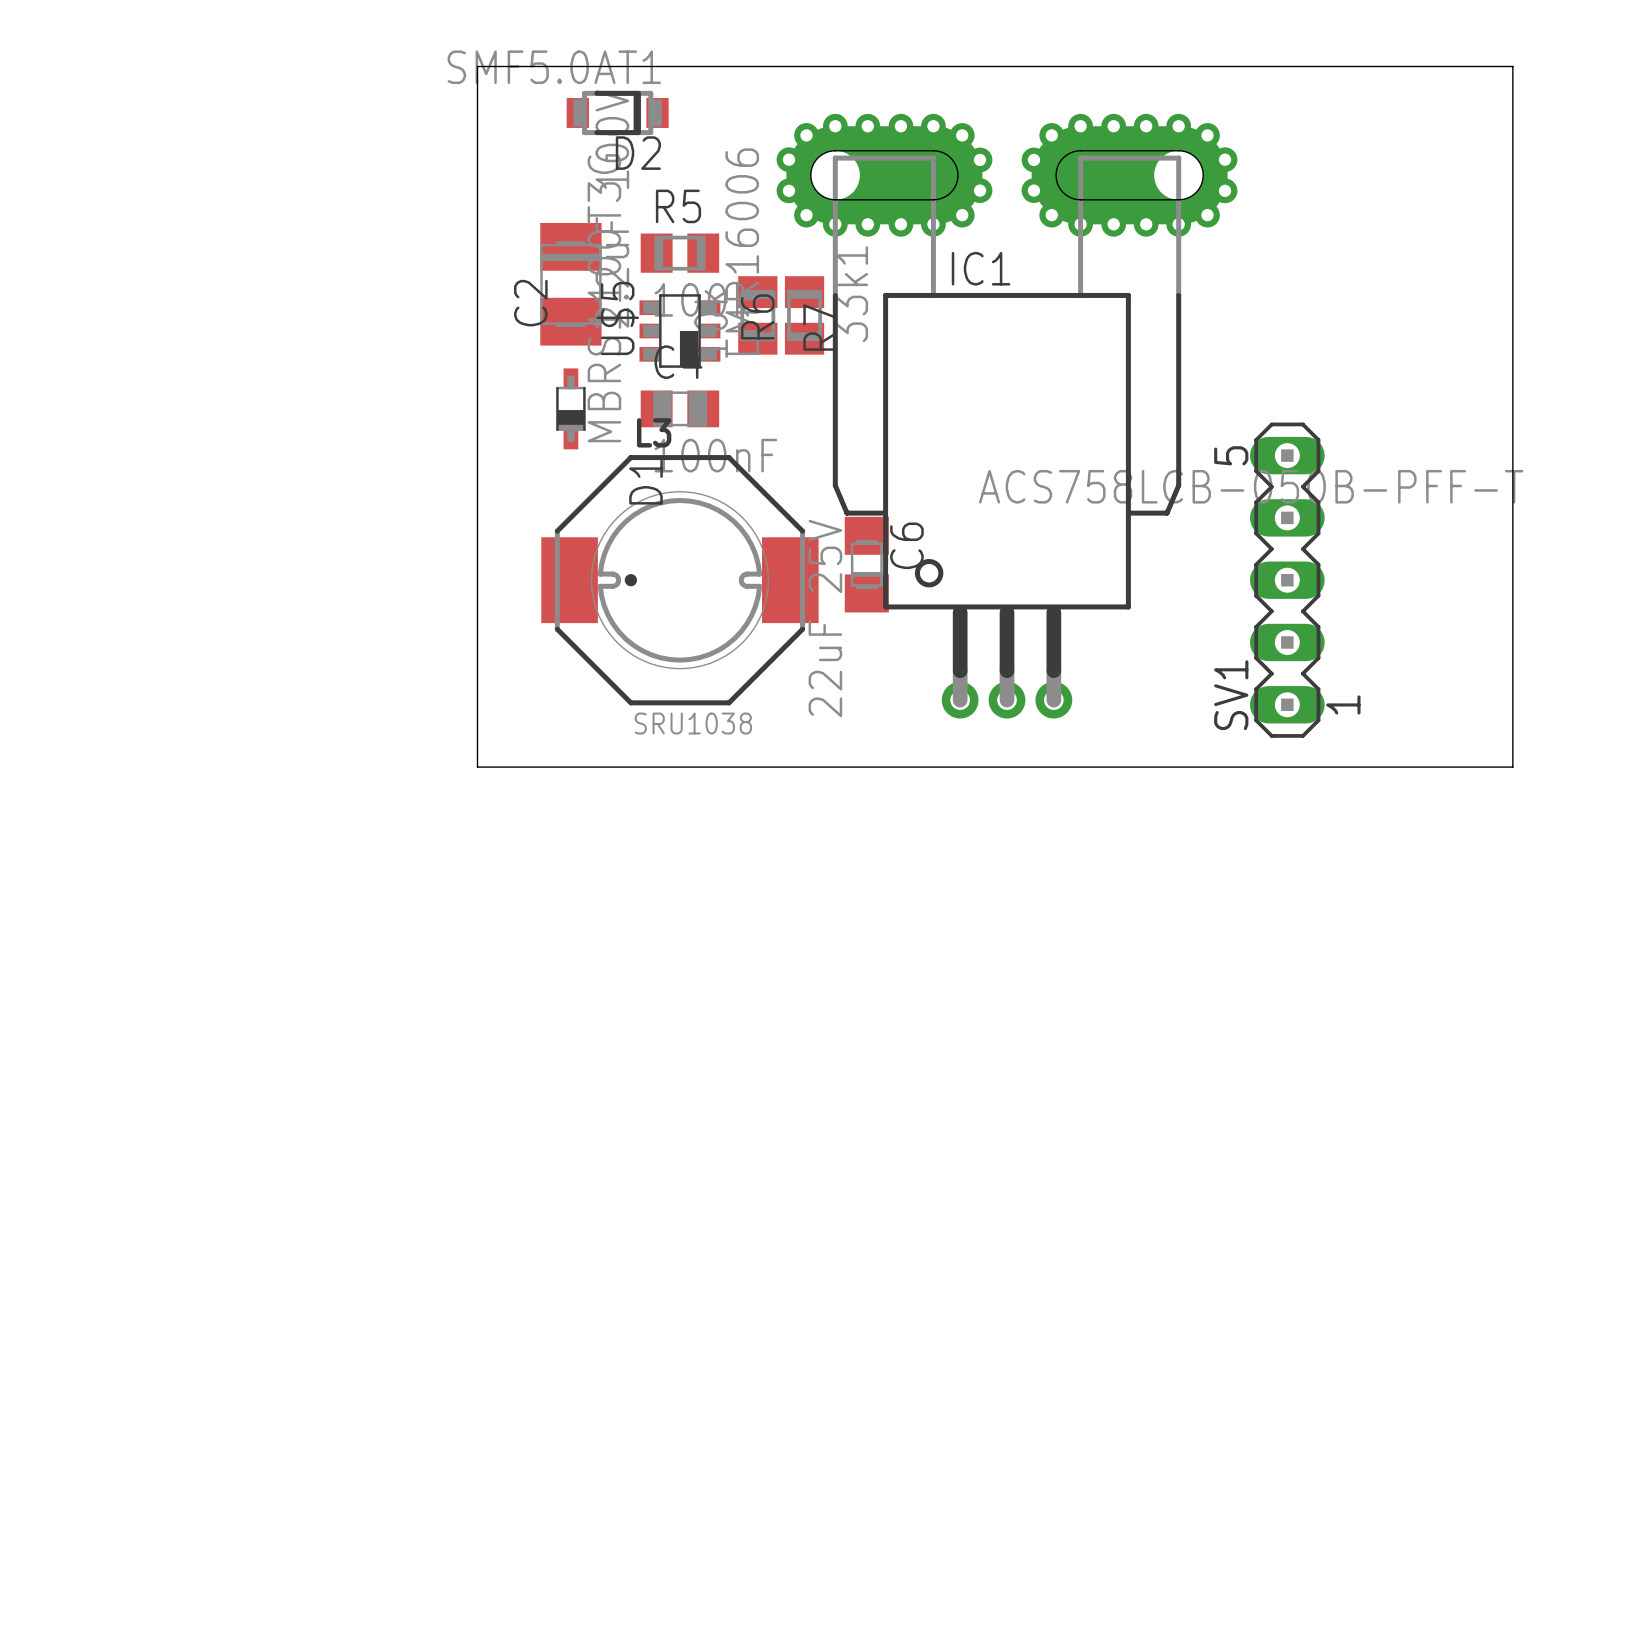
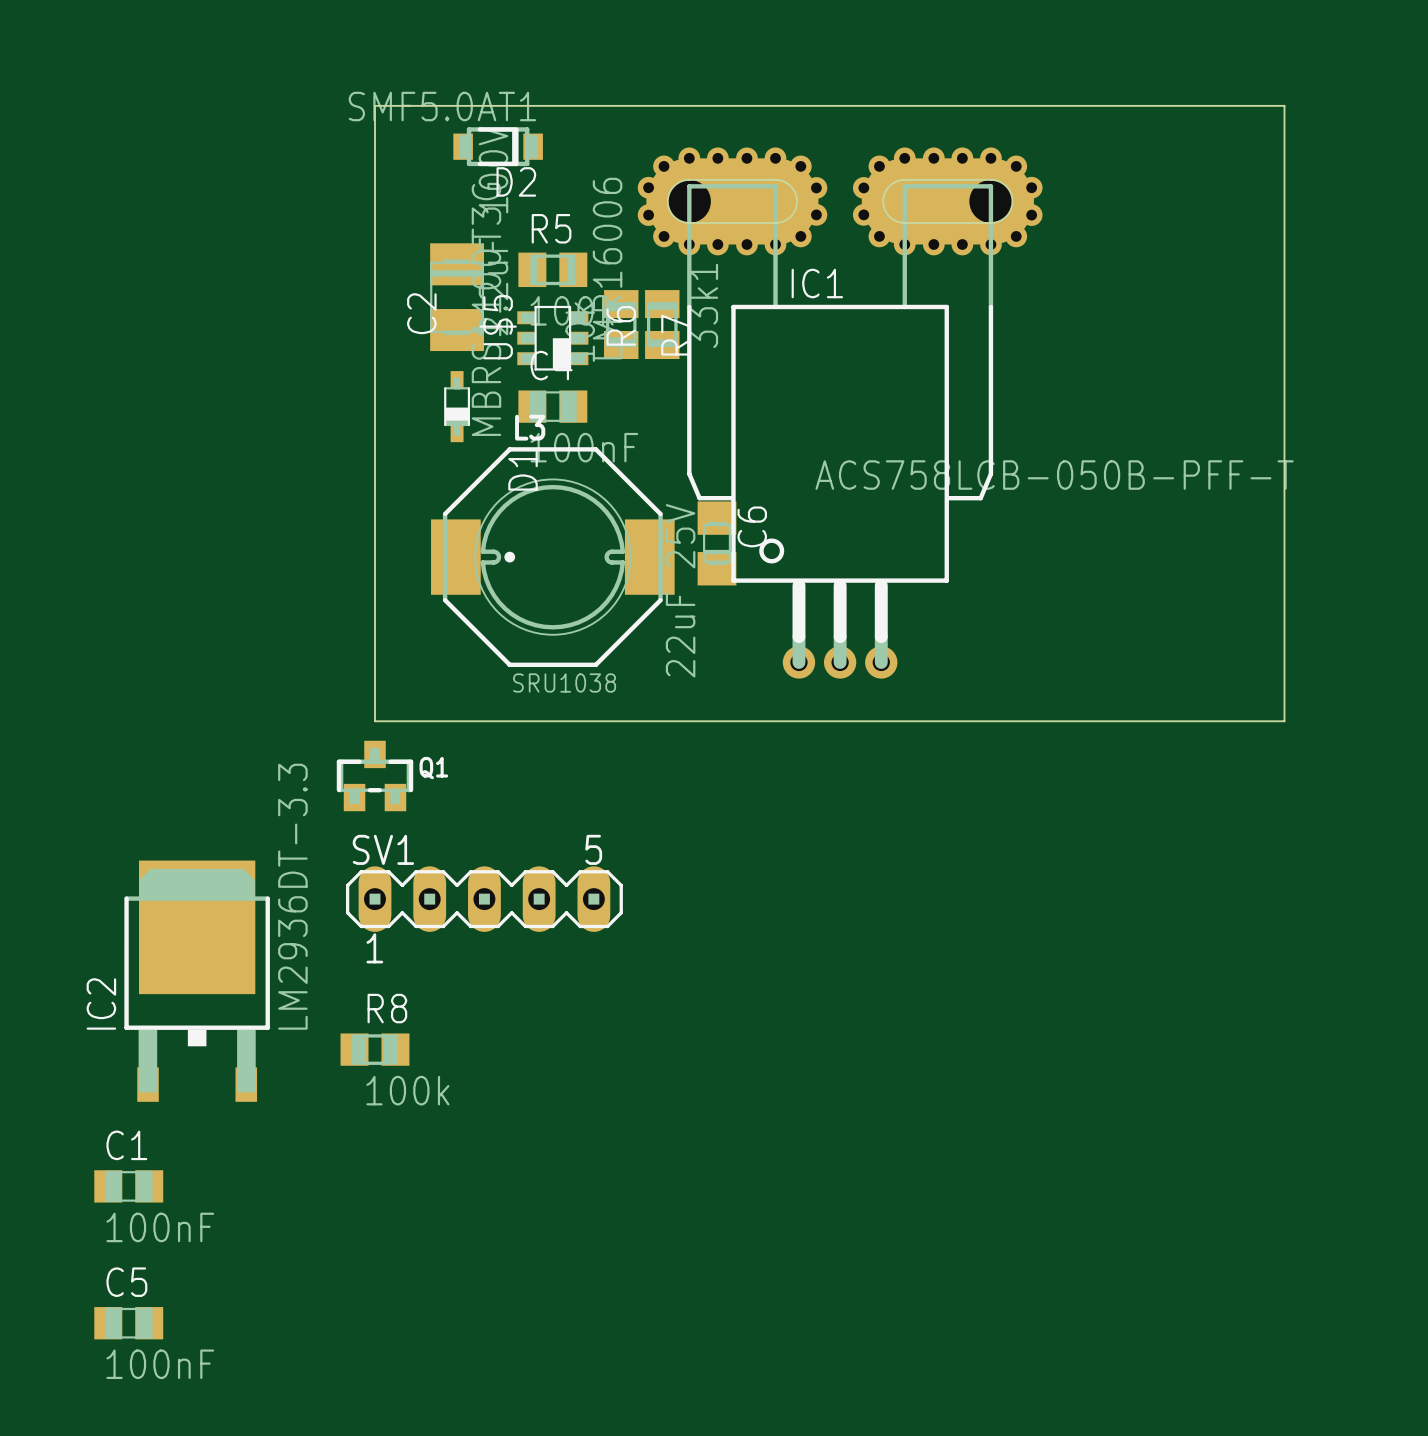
SV1 rotation: 0° (1287, 580) -> 90° clockwise (484, 899)
SV1 position: (1287, 580) -> (484, 899)
Q1: none -> (374, 775)
IC2: none -> LM2936DT-3.3 (197, 981)
R8: none -> 100k (374, 1049)
C1: none -> 100nF (128, 1186)
C5: none -> 100nF (128, 1323)

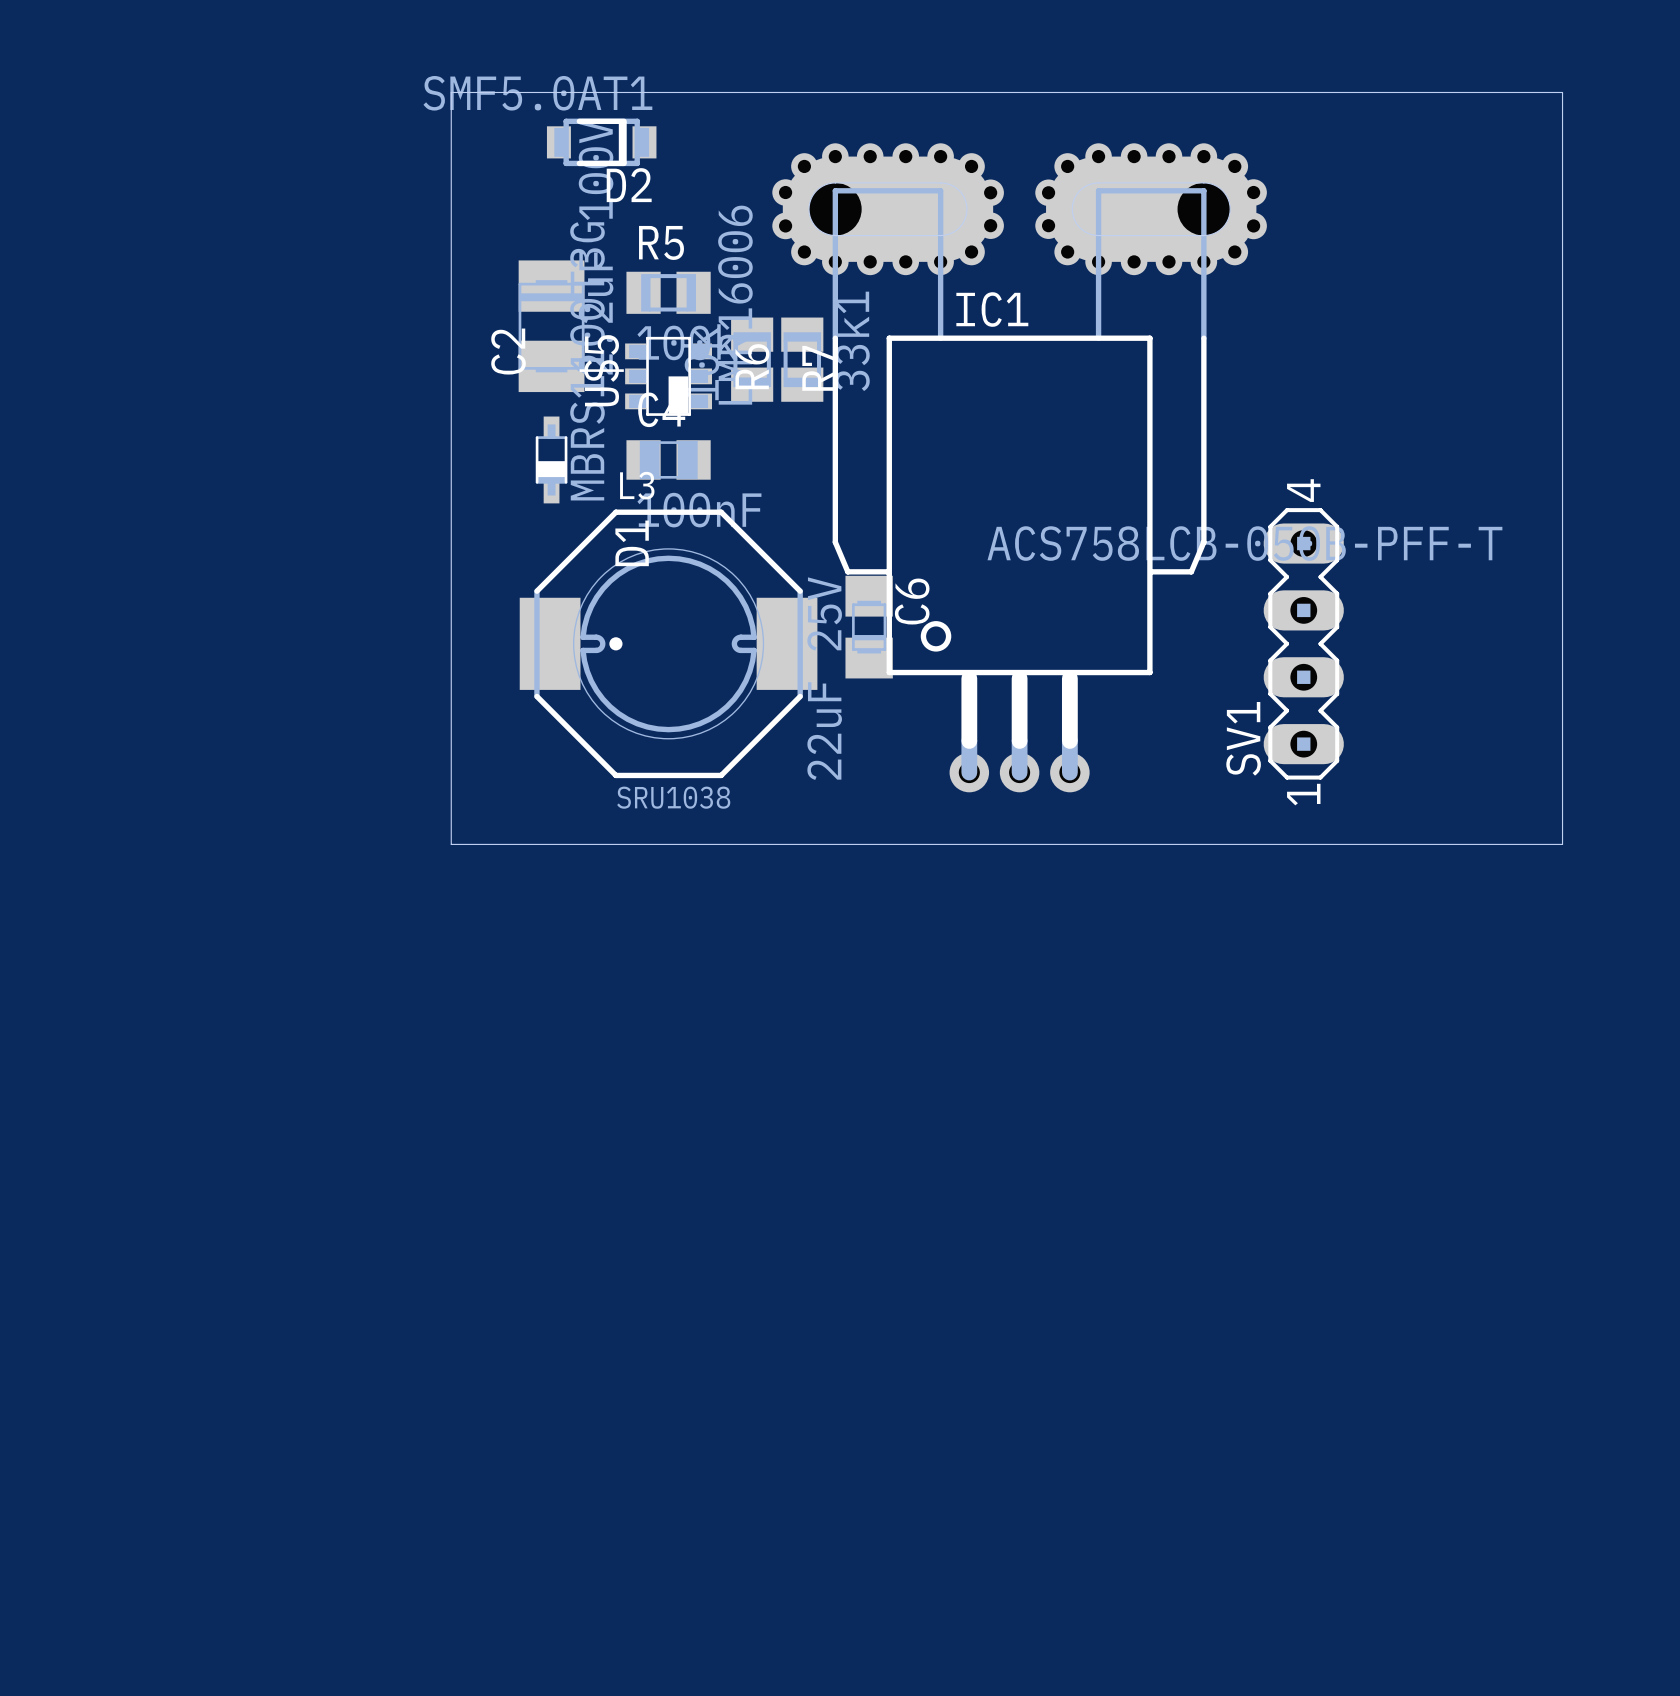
Q1: (374, 775) -> none
SV1 name position: SV1 (383, 849) -> SV1 (1243, 738)
SV1 footprint: [345, 866, 623, 932] -> [1263, 508, 1344, 780]
IC2: LM2936DT-3.3 (197, 981) -> none
R8: 100k (374, 1049) -> none
C1: 100nF (128, 1186) -> none
C5: 100nF (128, 1323) -> none

